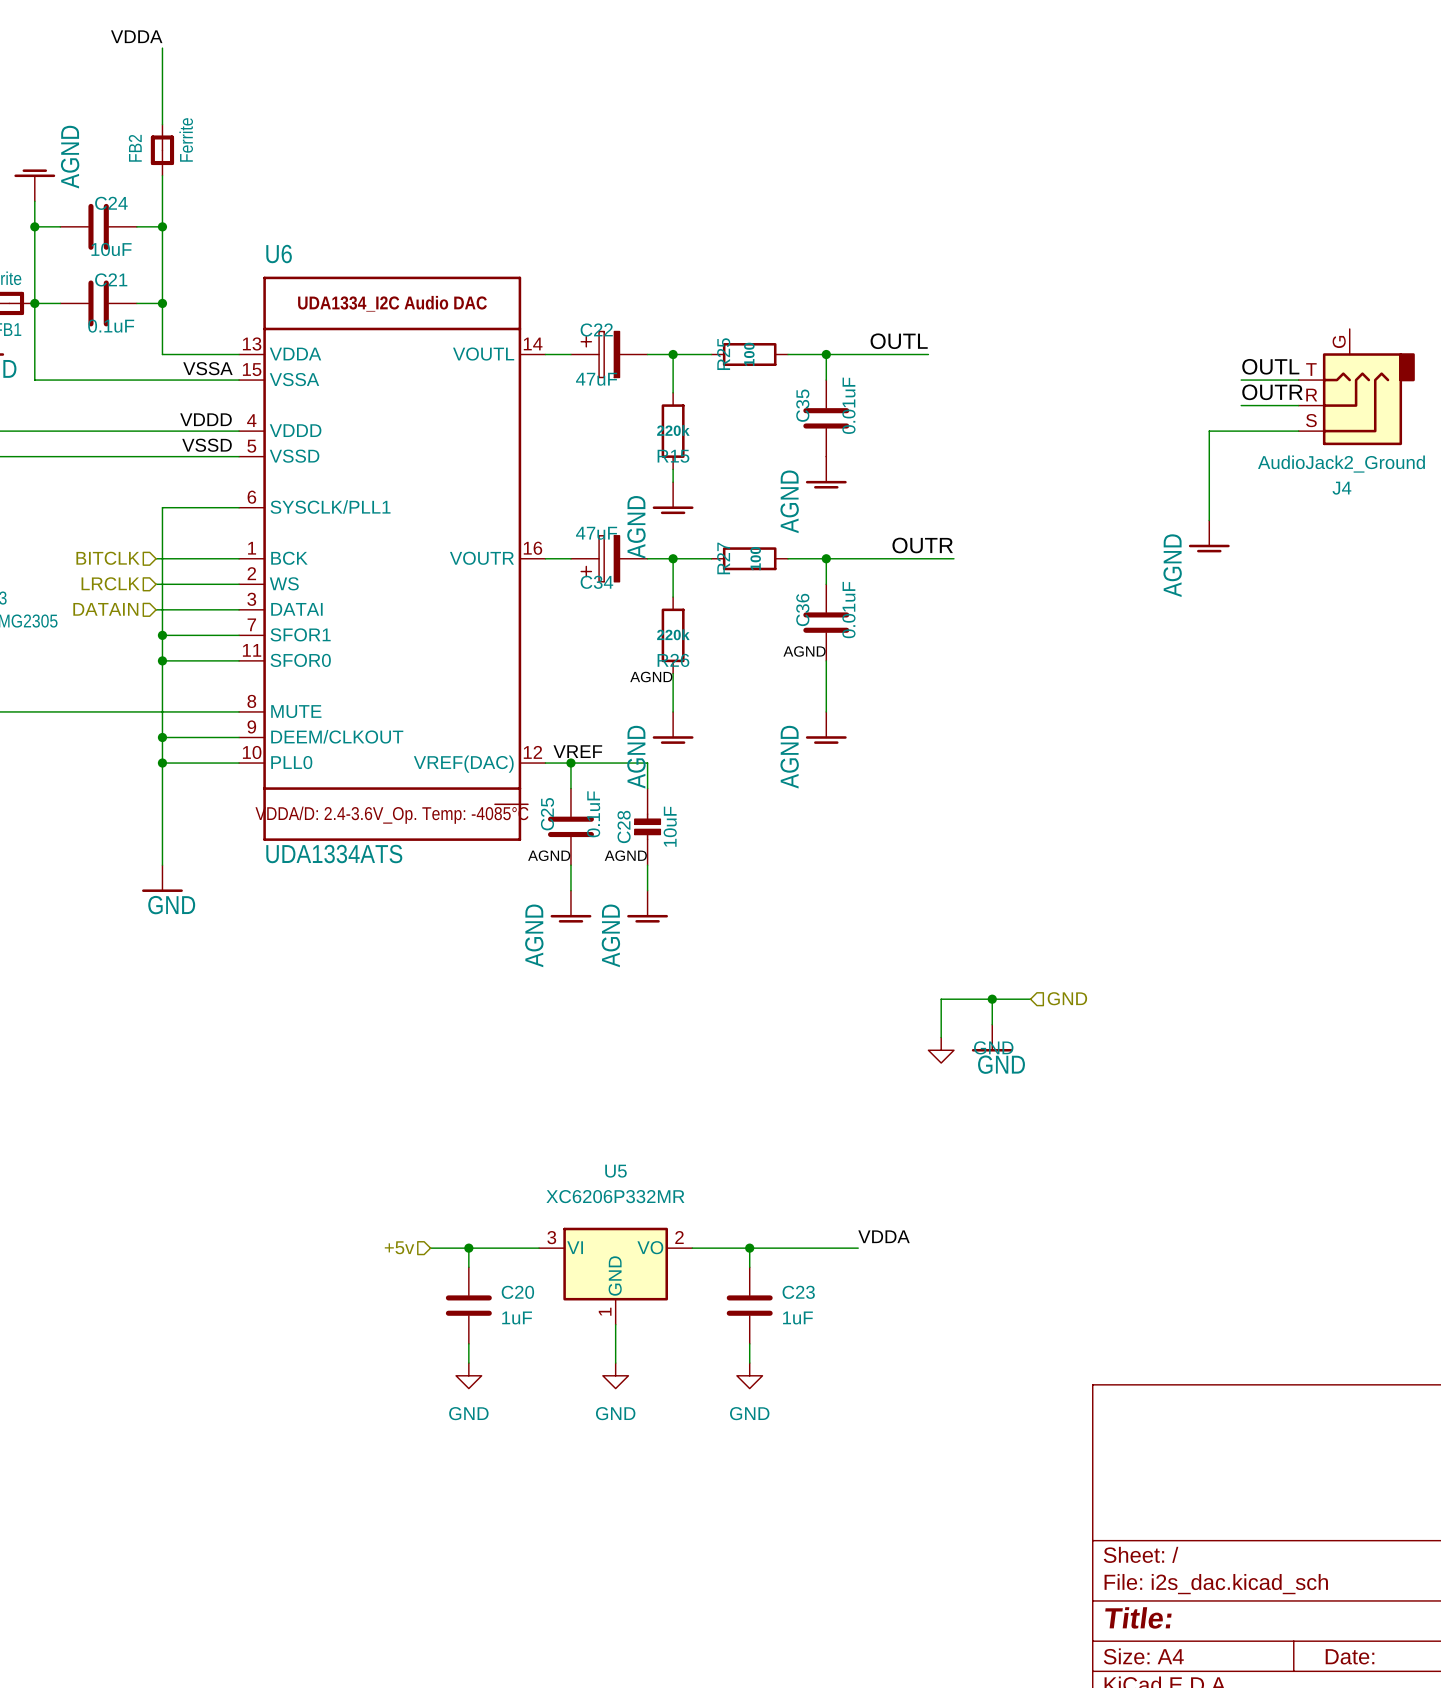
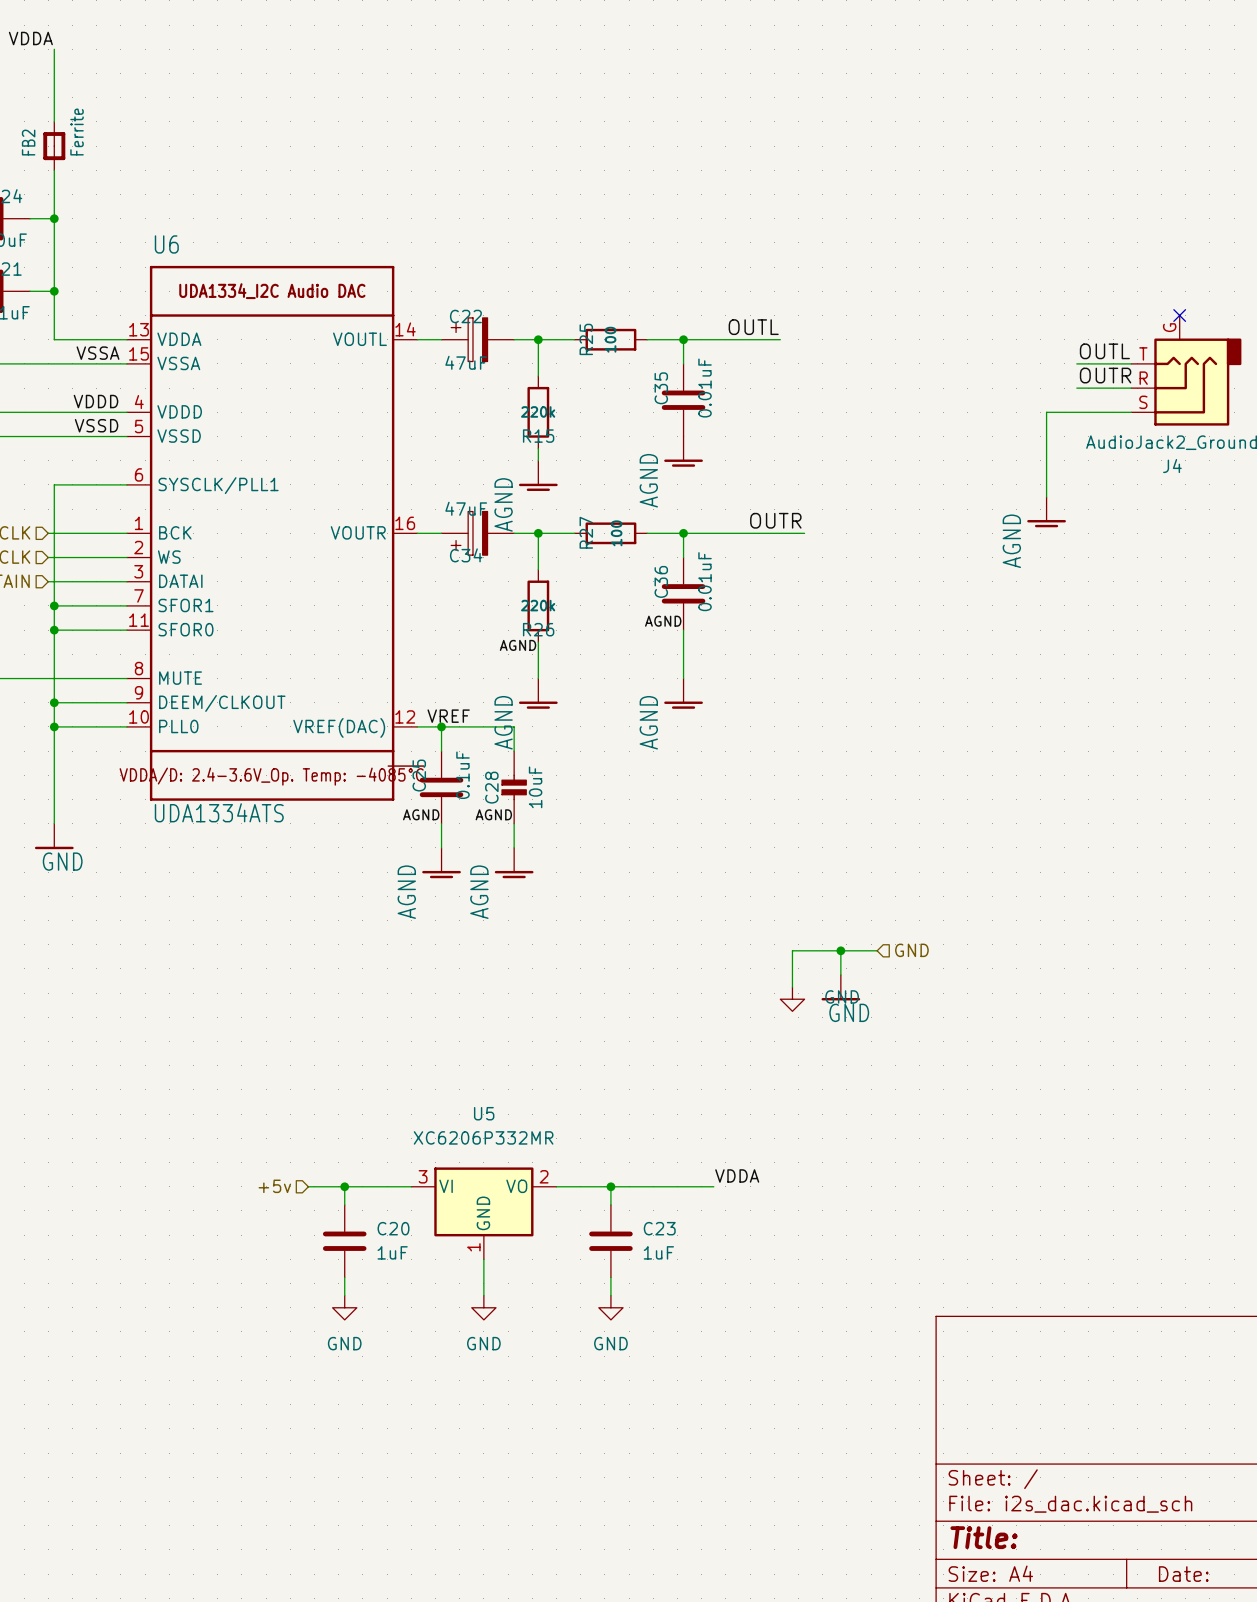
no-connect mark: none -> (1179, 315)

